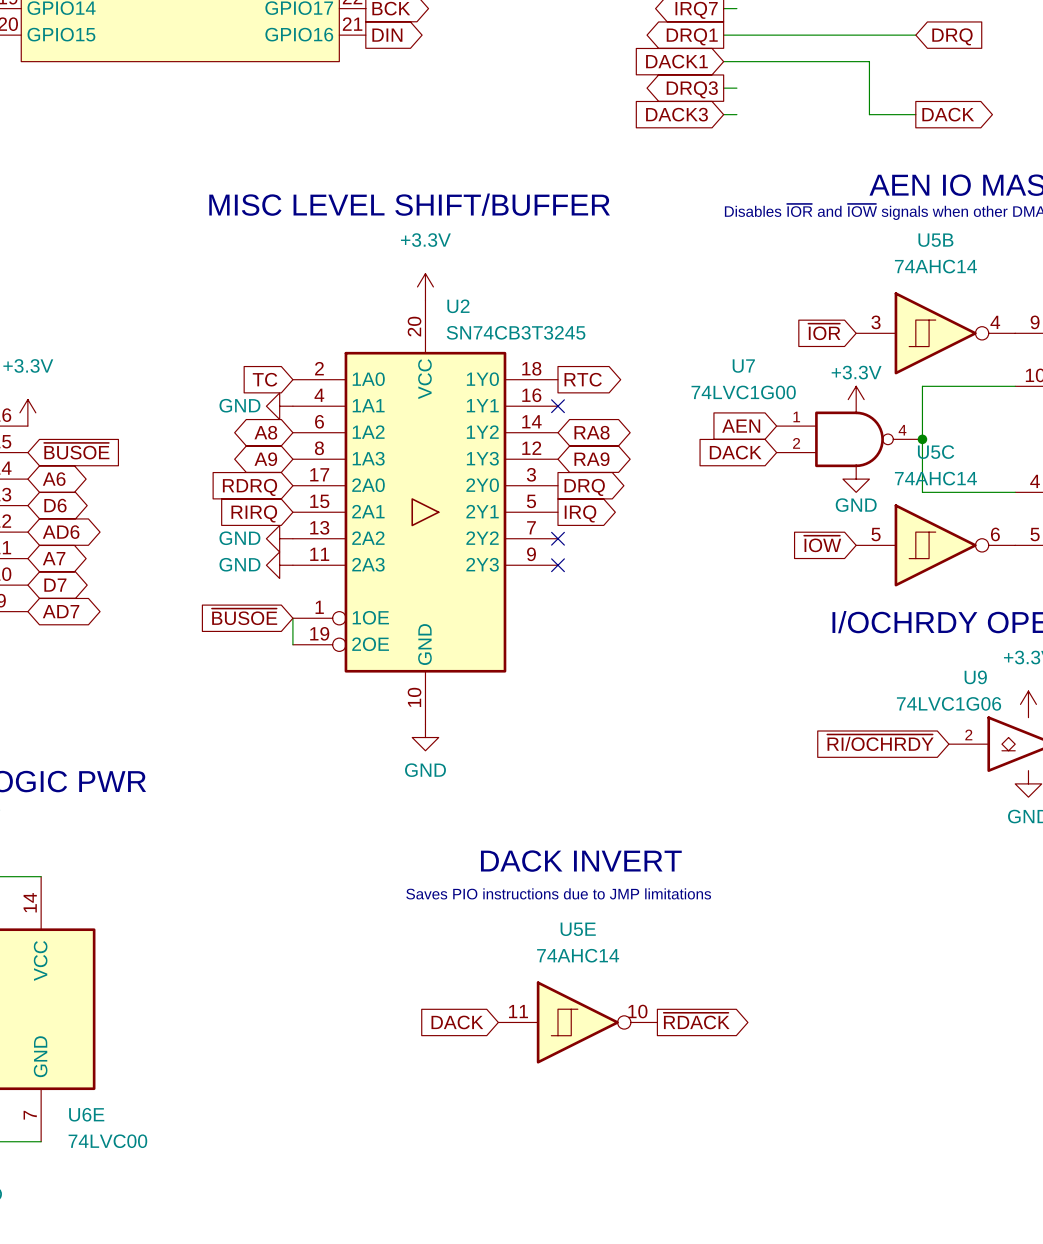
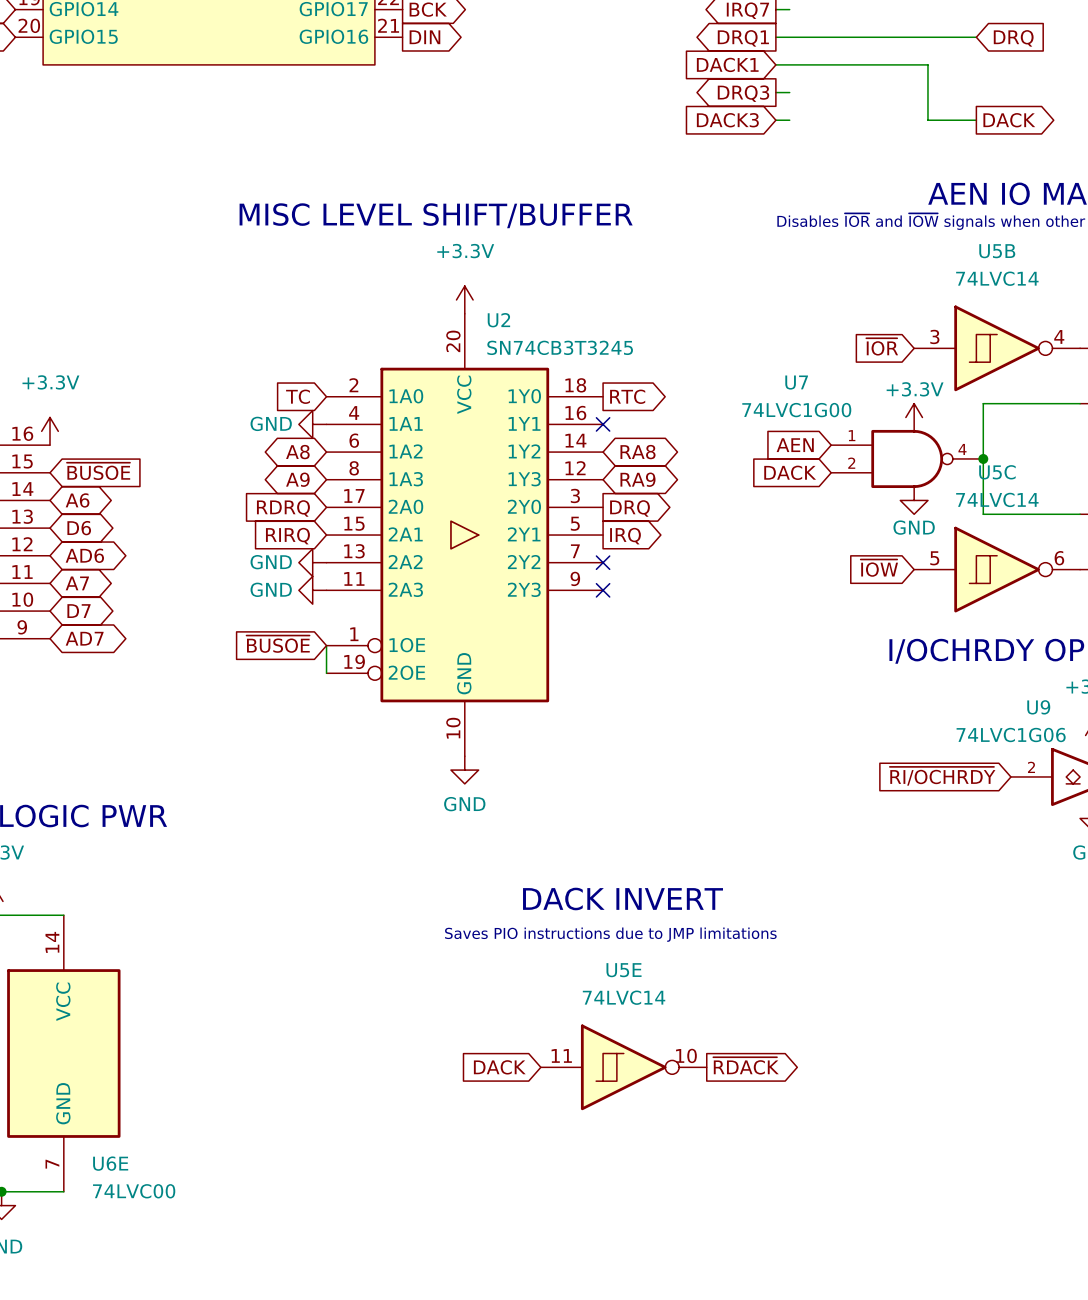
U5B value: 74AHC14 (935, 266) -> 74LVC14 (997, 278)
U5C value: 74AHC14 (935, 478) -> 74LVC14 (997, 499)
U5E value: 74AHC14 (578, 955) -> 74LVC14 (624, 997)

